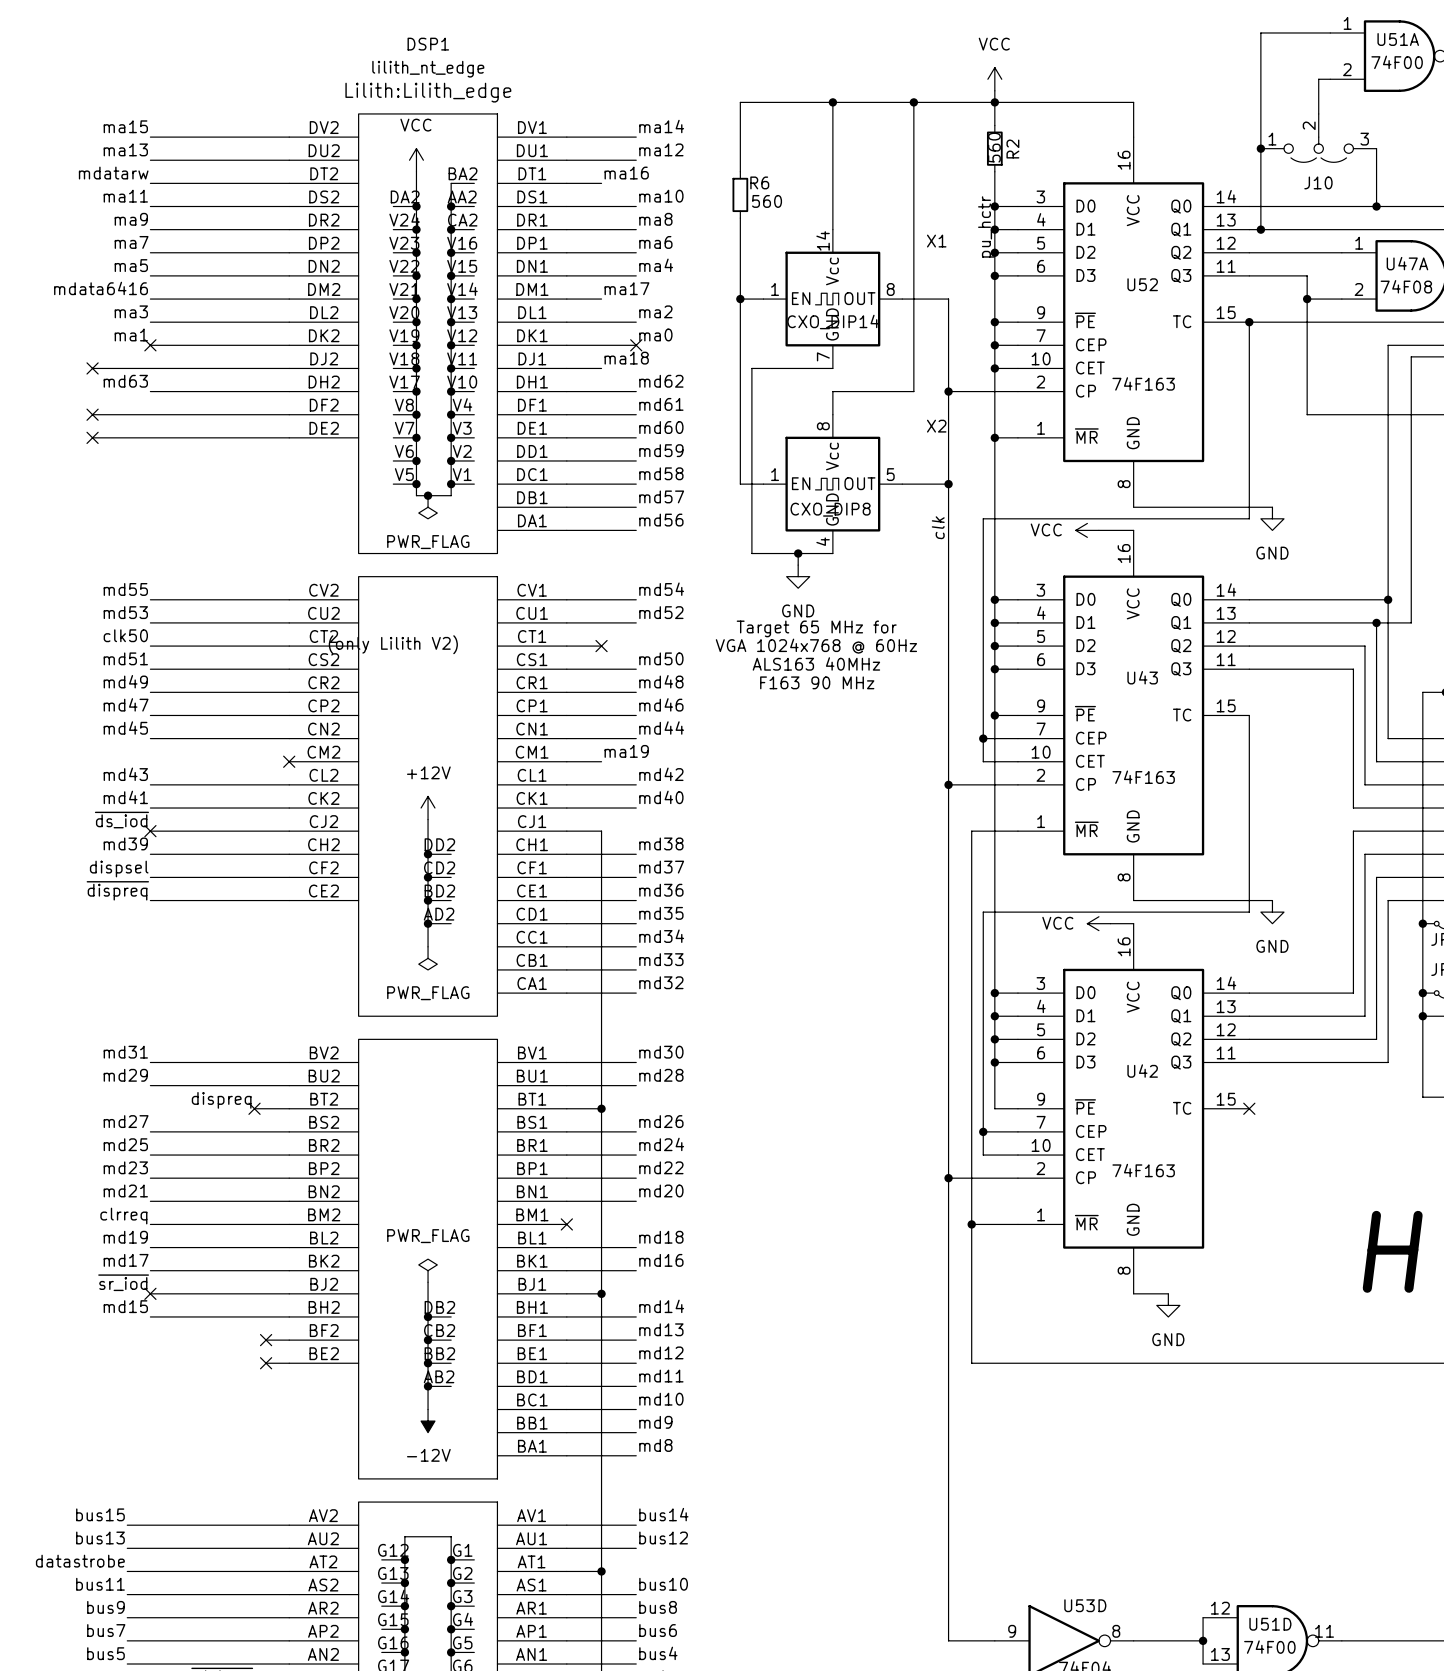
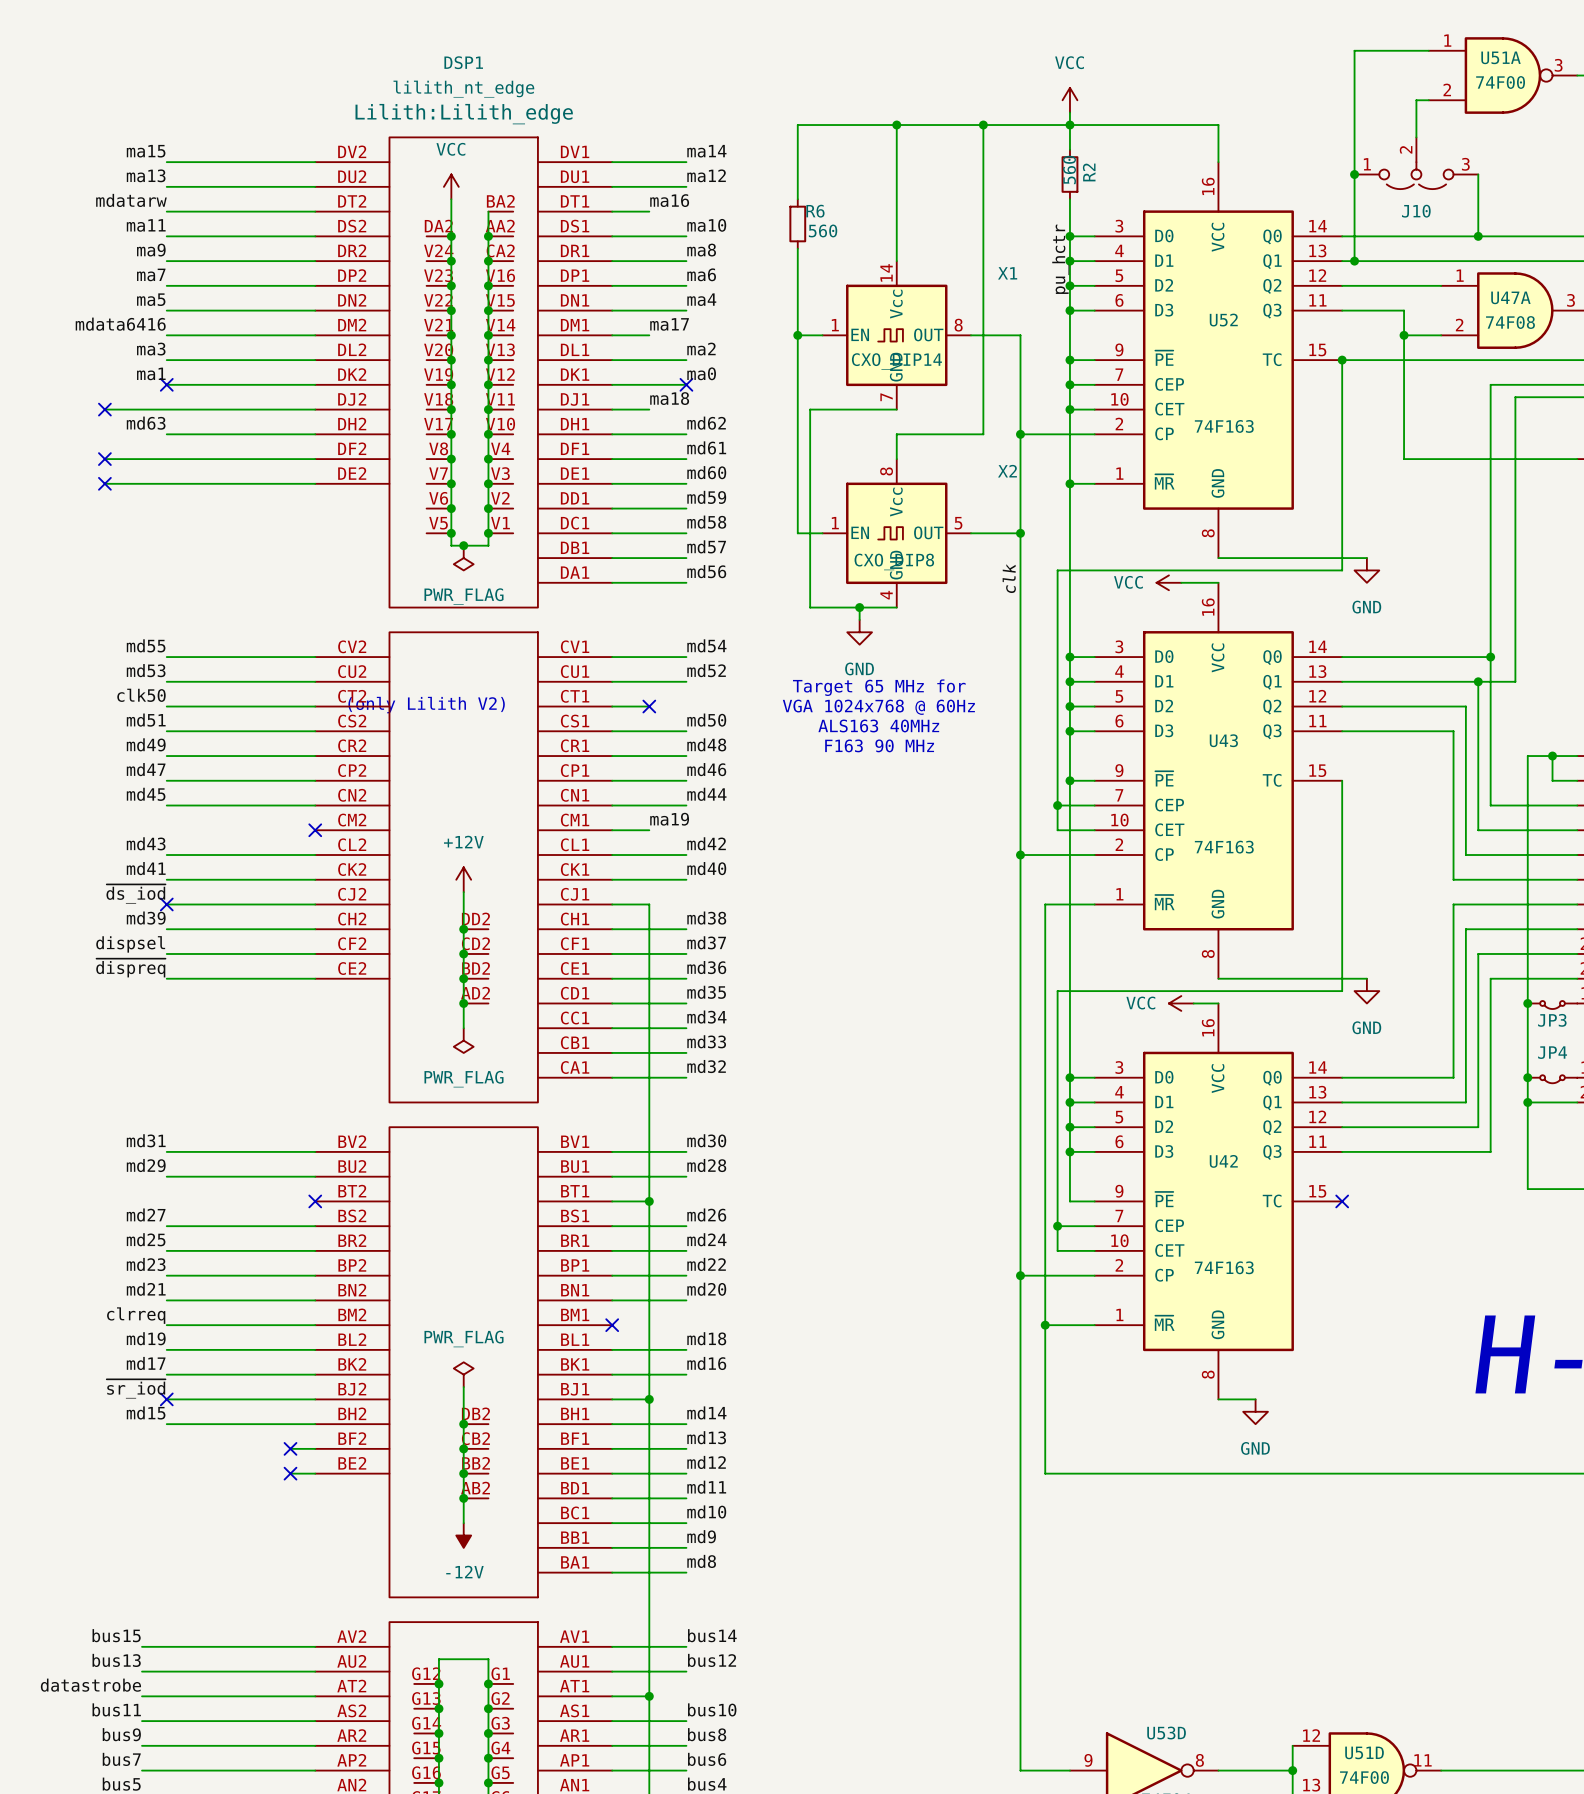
label: dispreq (221, 1100) -> none
wire: (254, 1108) (289, 1108) -> none
no-connect mark position: (254, 1108) -> (315, 1201)

